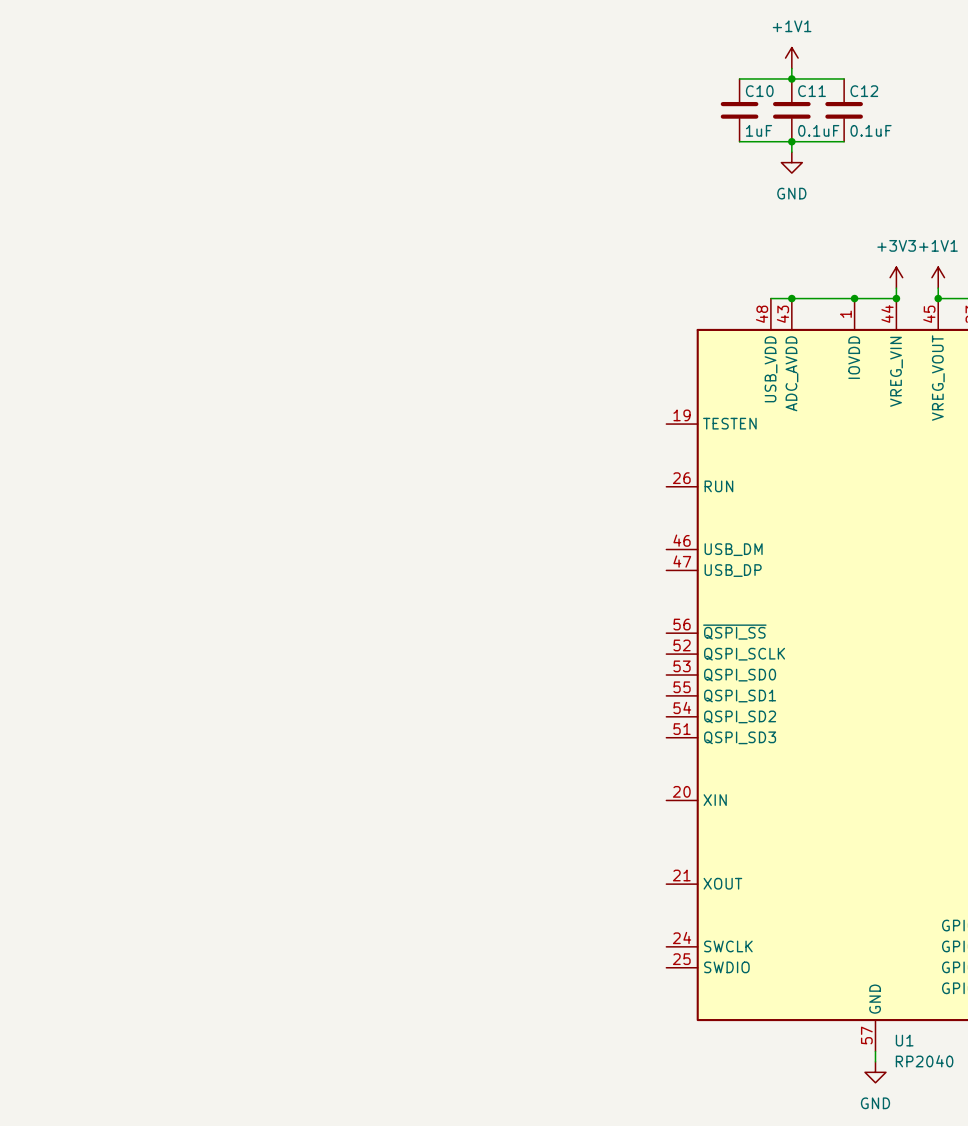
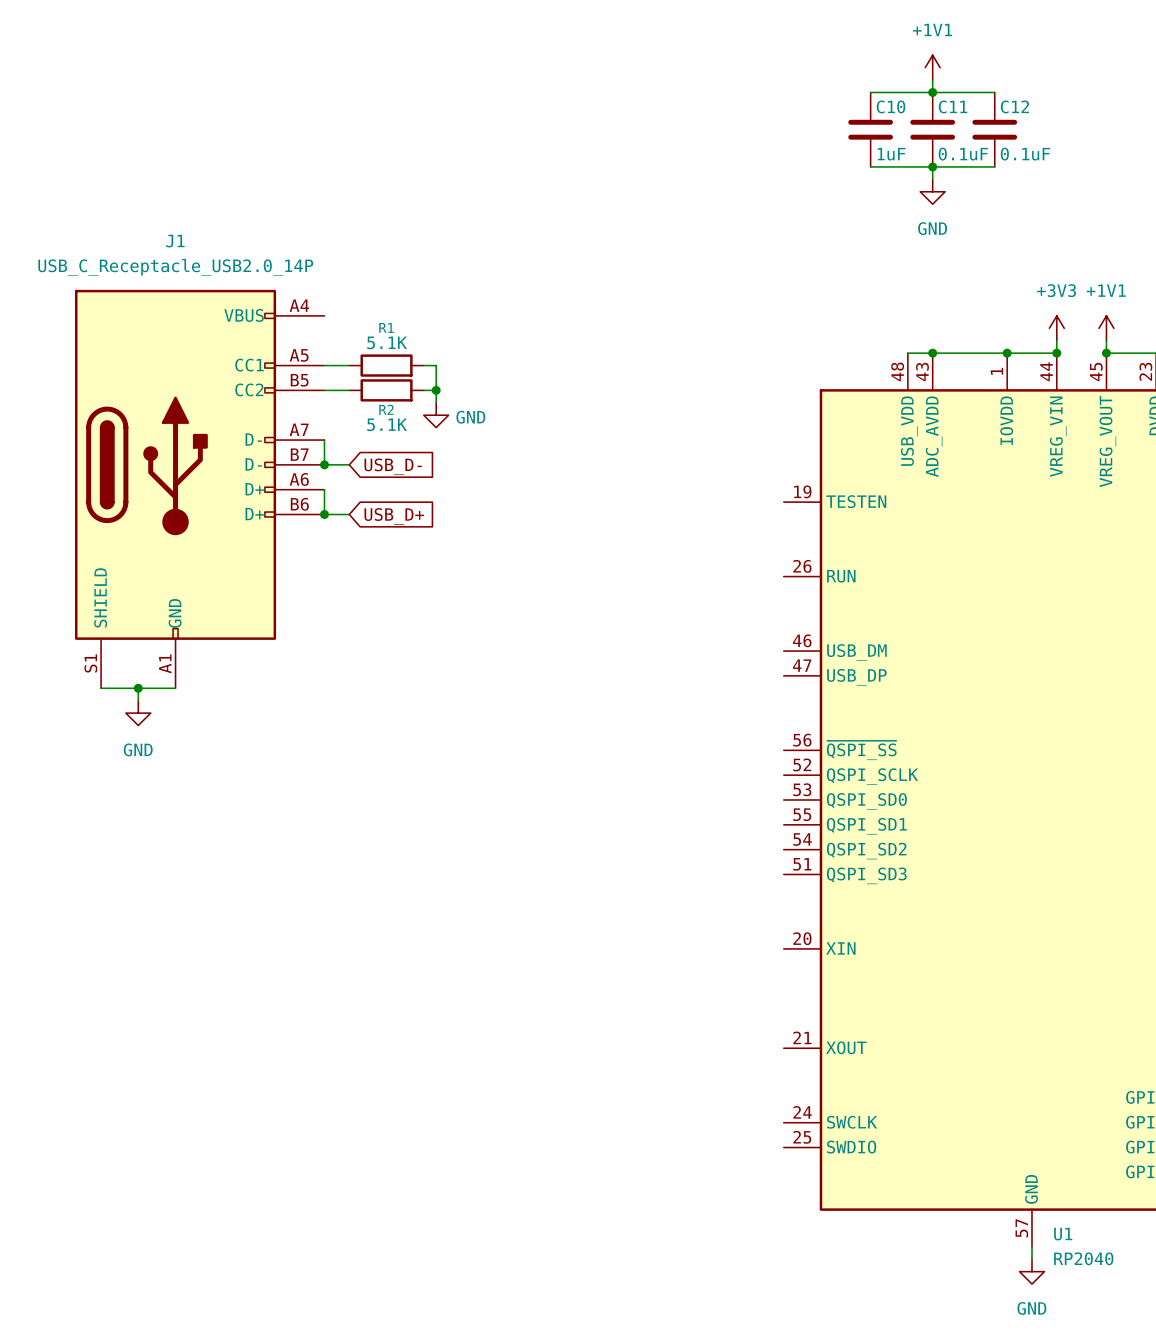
wire: none -> (324, 365) (349, 365)
R1: none -> 5.1K (386, 365)
wire: none -> (423, 365) (436, 365) (436, 402)
wire: none -> (324, 390) (349, 390)
R2: none -> 5.1K (386, 390)
wire: none -> (423, 390) (436, 390)
junction: none -> (436, 390)
power symbol: none -> GND (436, 415)
wire: none -> (324, 440) (324, 464) (349, 464)
junction: none -> (324, 464)
global label: none -> USB_D- (393, 466)
J1: none -> USB_C_Receptacle_USB2.0_14P (199, 489)
wire: none -> (324, 489) (324, 514) (349, 514)
junction: none -> (324, 514)
global label: none -> USB_D+ (394, 516)
wire: none -> (101, 688) (175, 688)
wire: none -> (138, 688) (138, 700)
junction: none -> (138, 688)
power symbol: none -> GND (138, 713)

